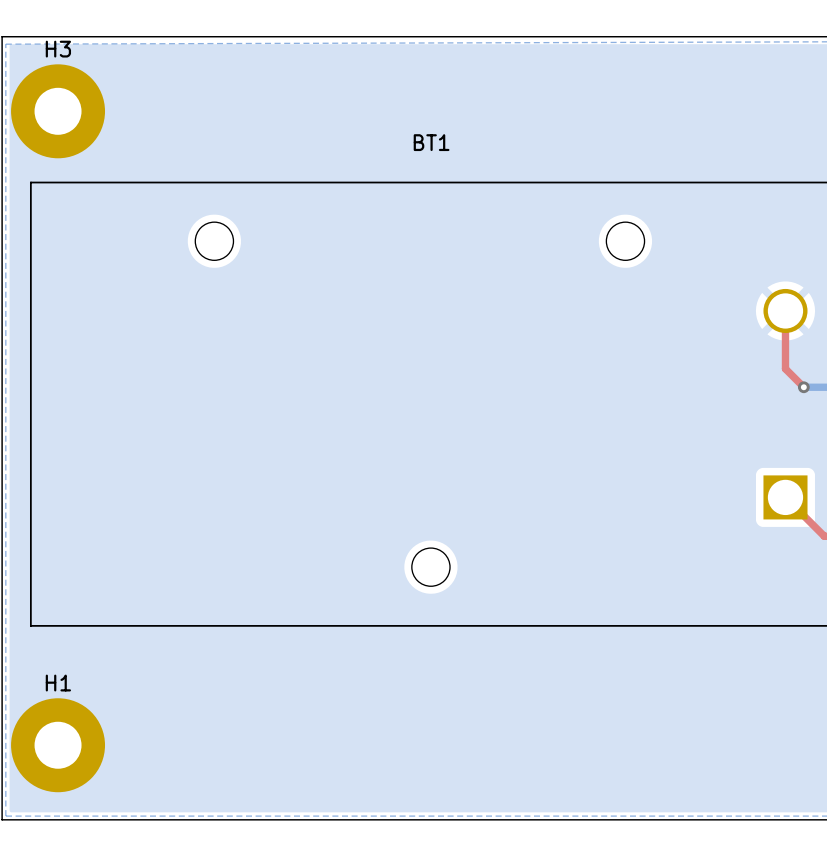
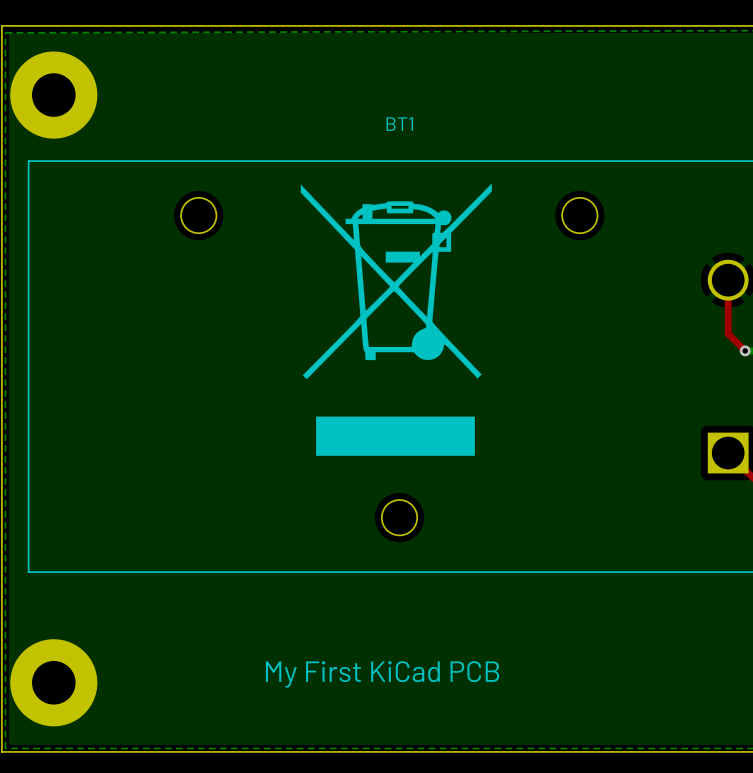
H3 name: H3 (58, 49) -> none
drawing: none -> [300, 183, 492, 456]
H1 name: H1 (58, 683) -> none
text: none -> My First KiCad PCB (382, 674)

